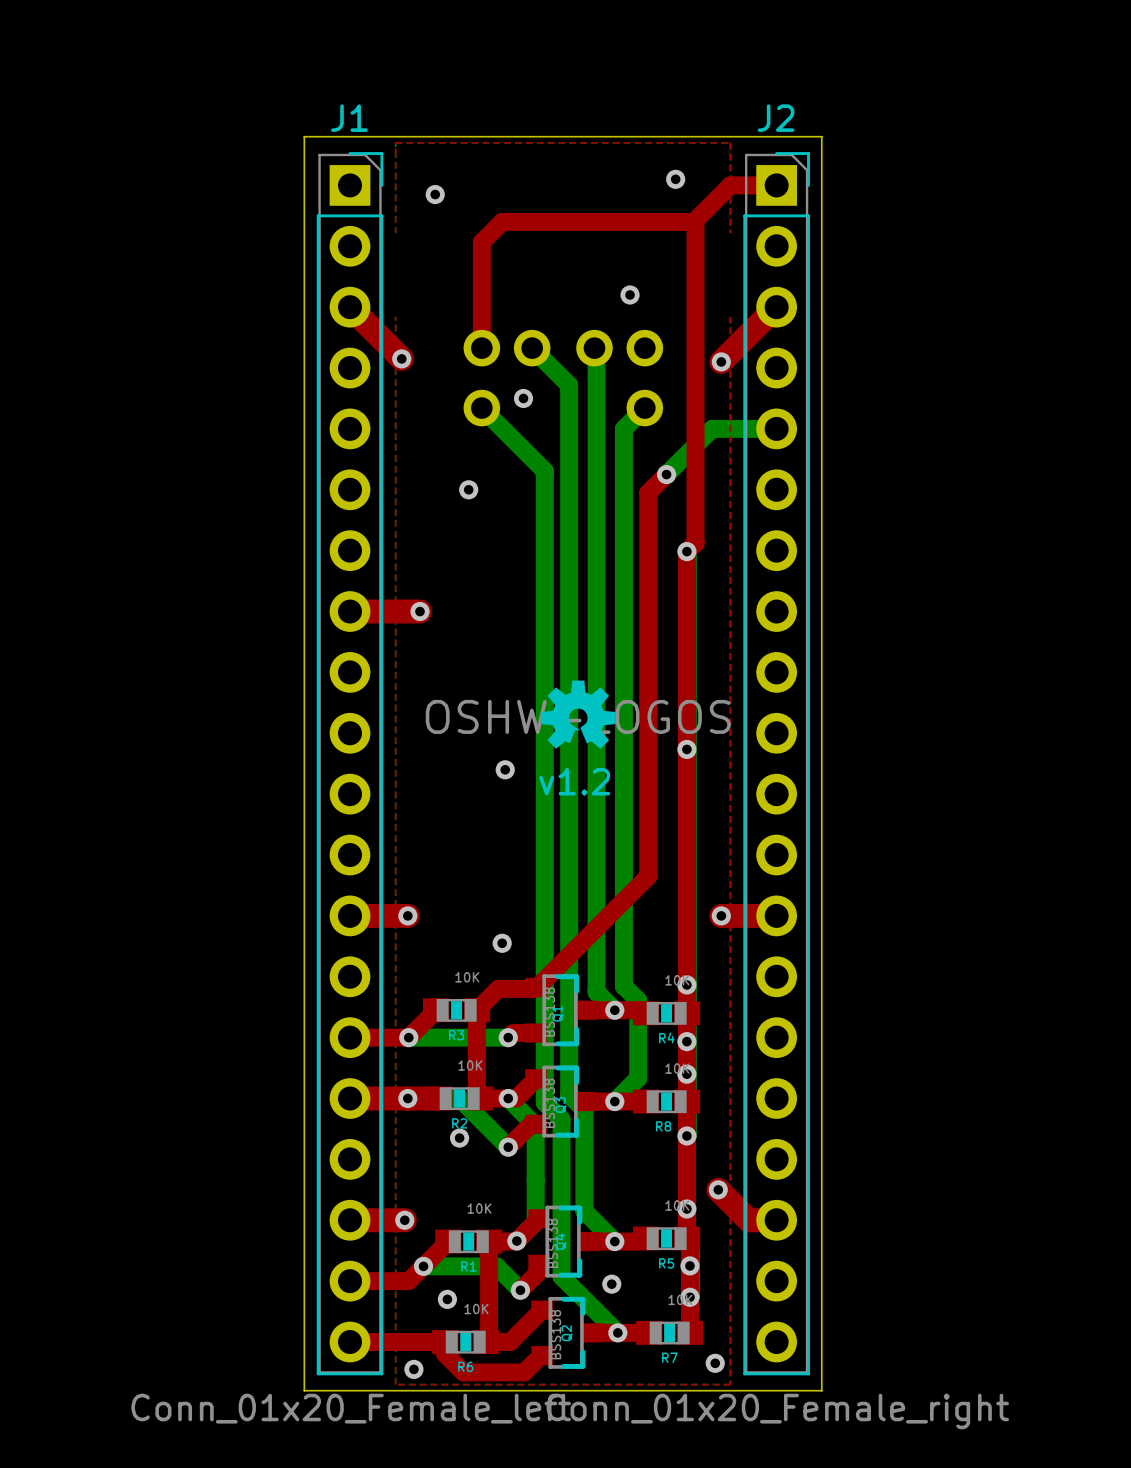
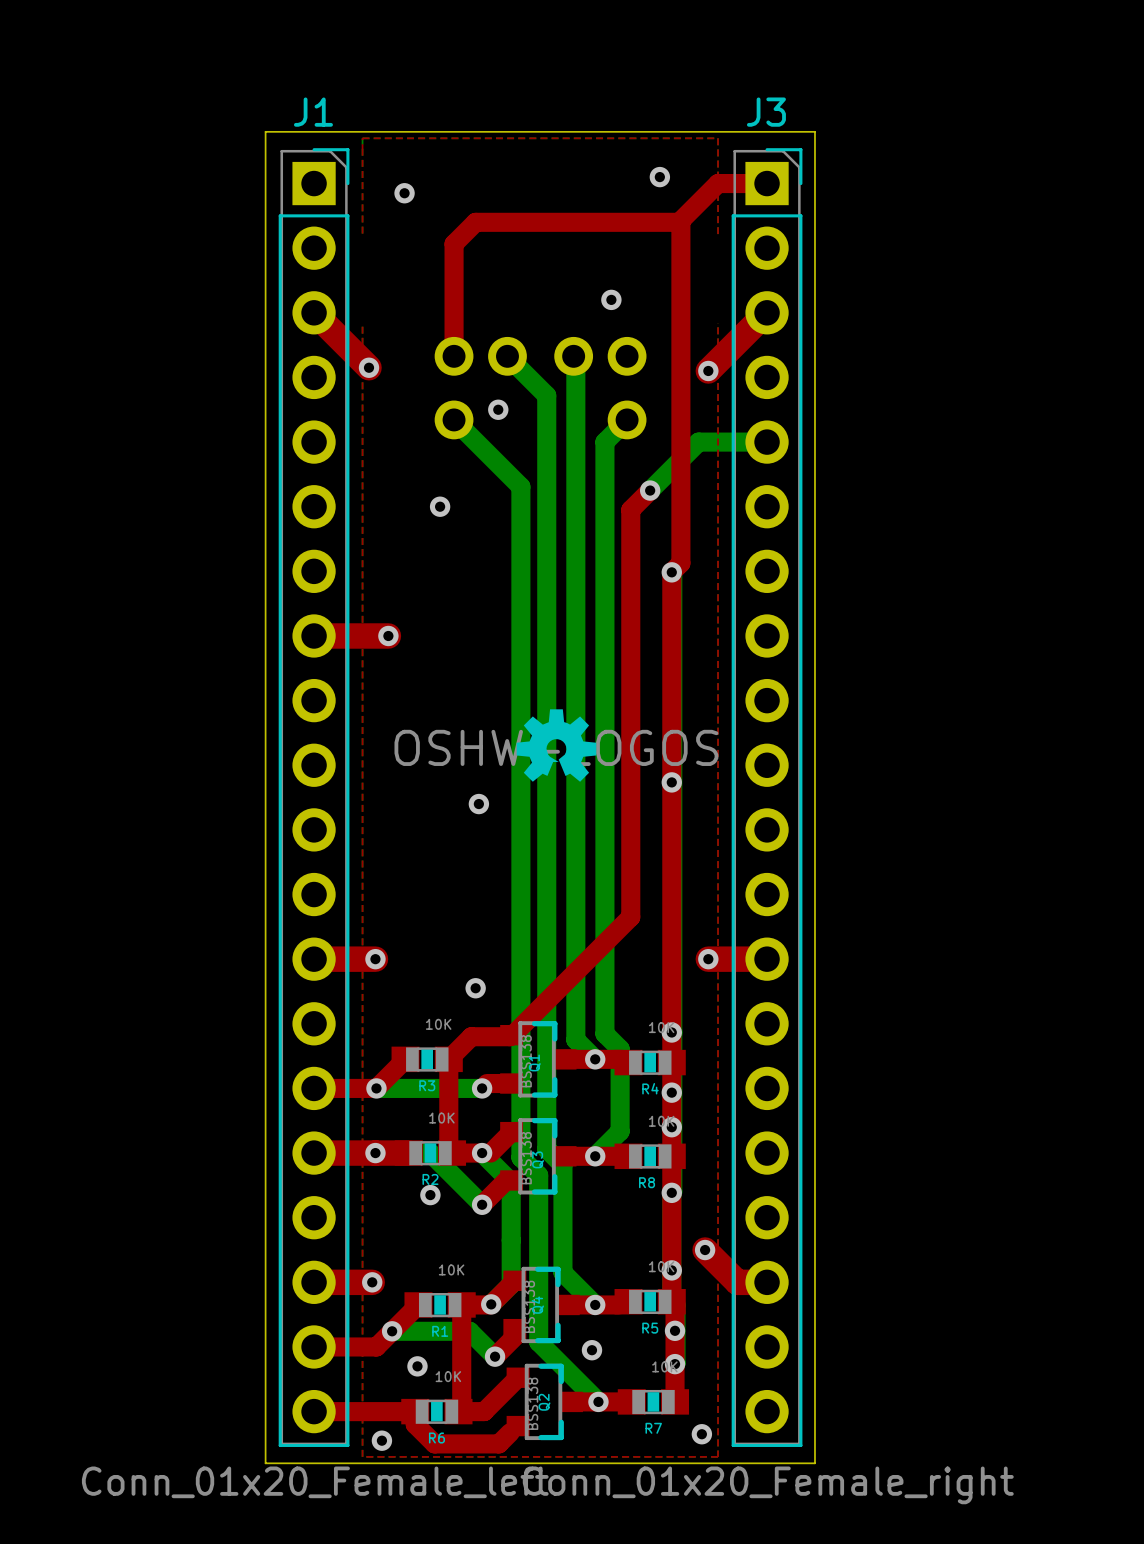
J2 name: J2 (776, 118) -> J3 (766, 112)
text: v1.2 (574, 781) -> none

